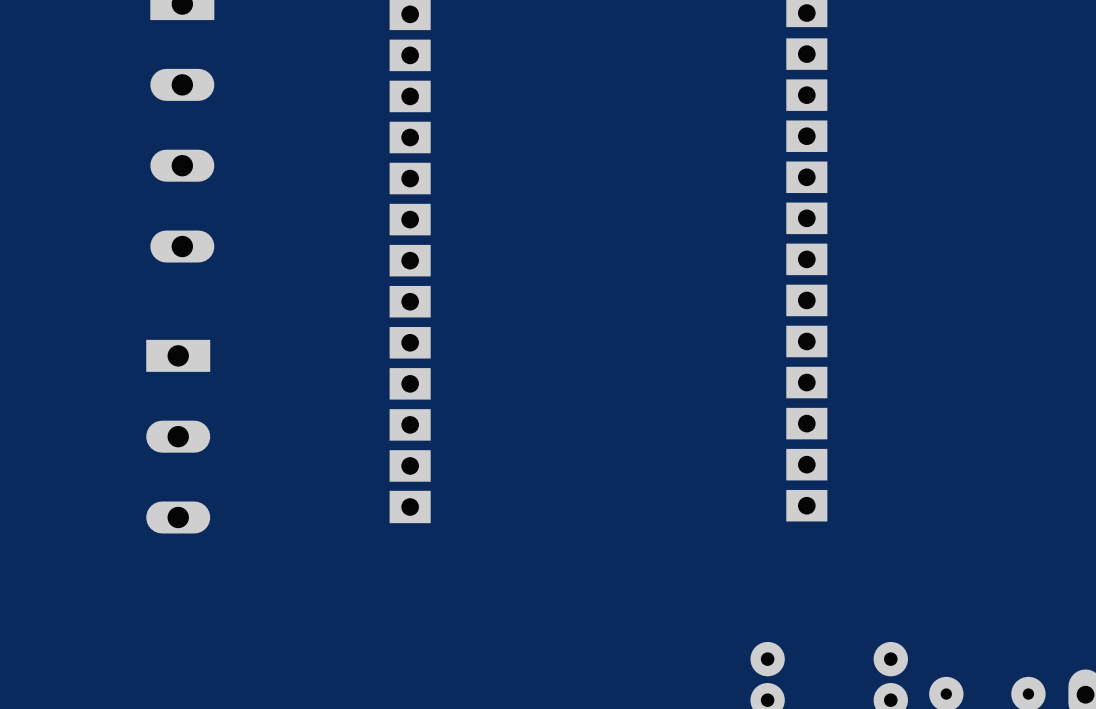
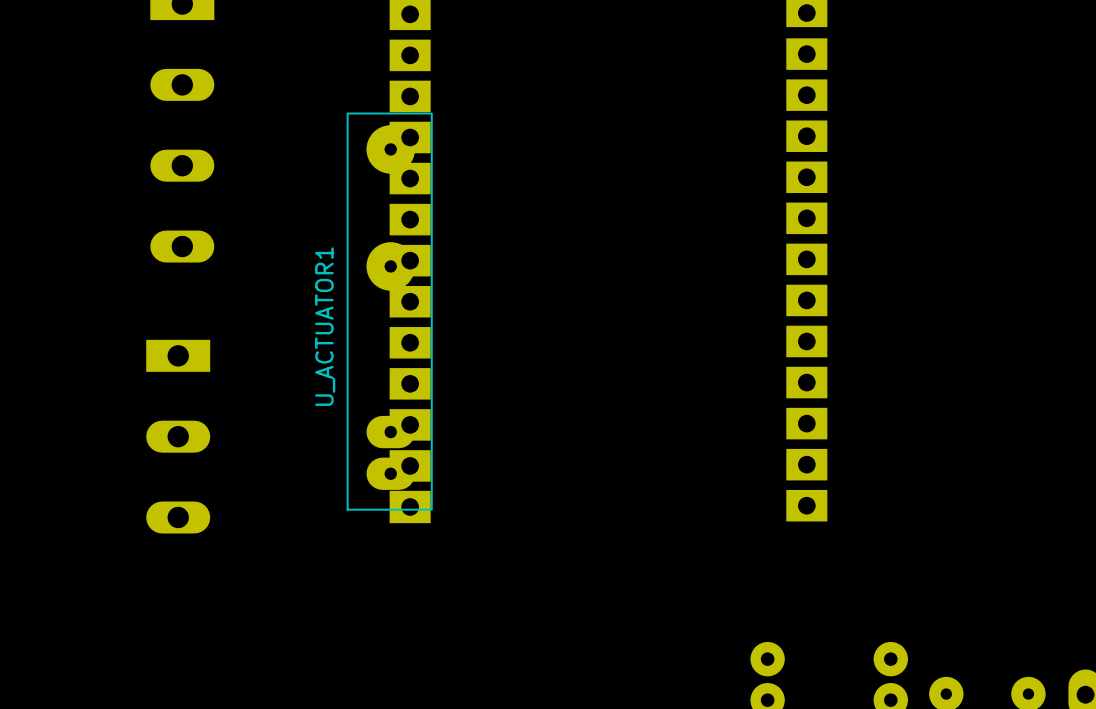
U_ACTUATOR1: none -> (389, 311)

